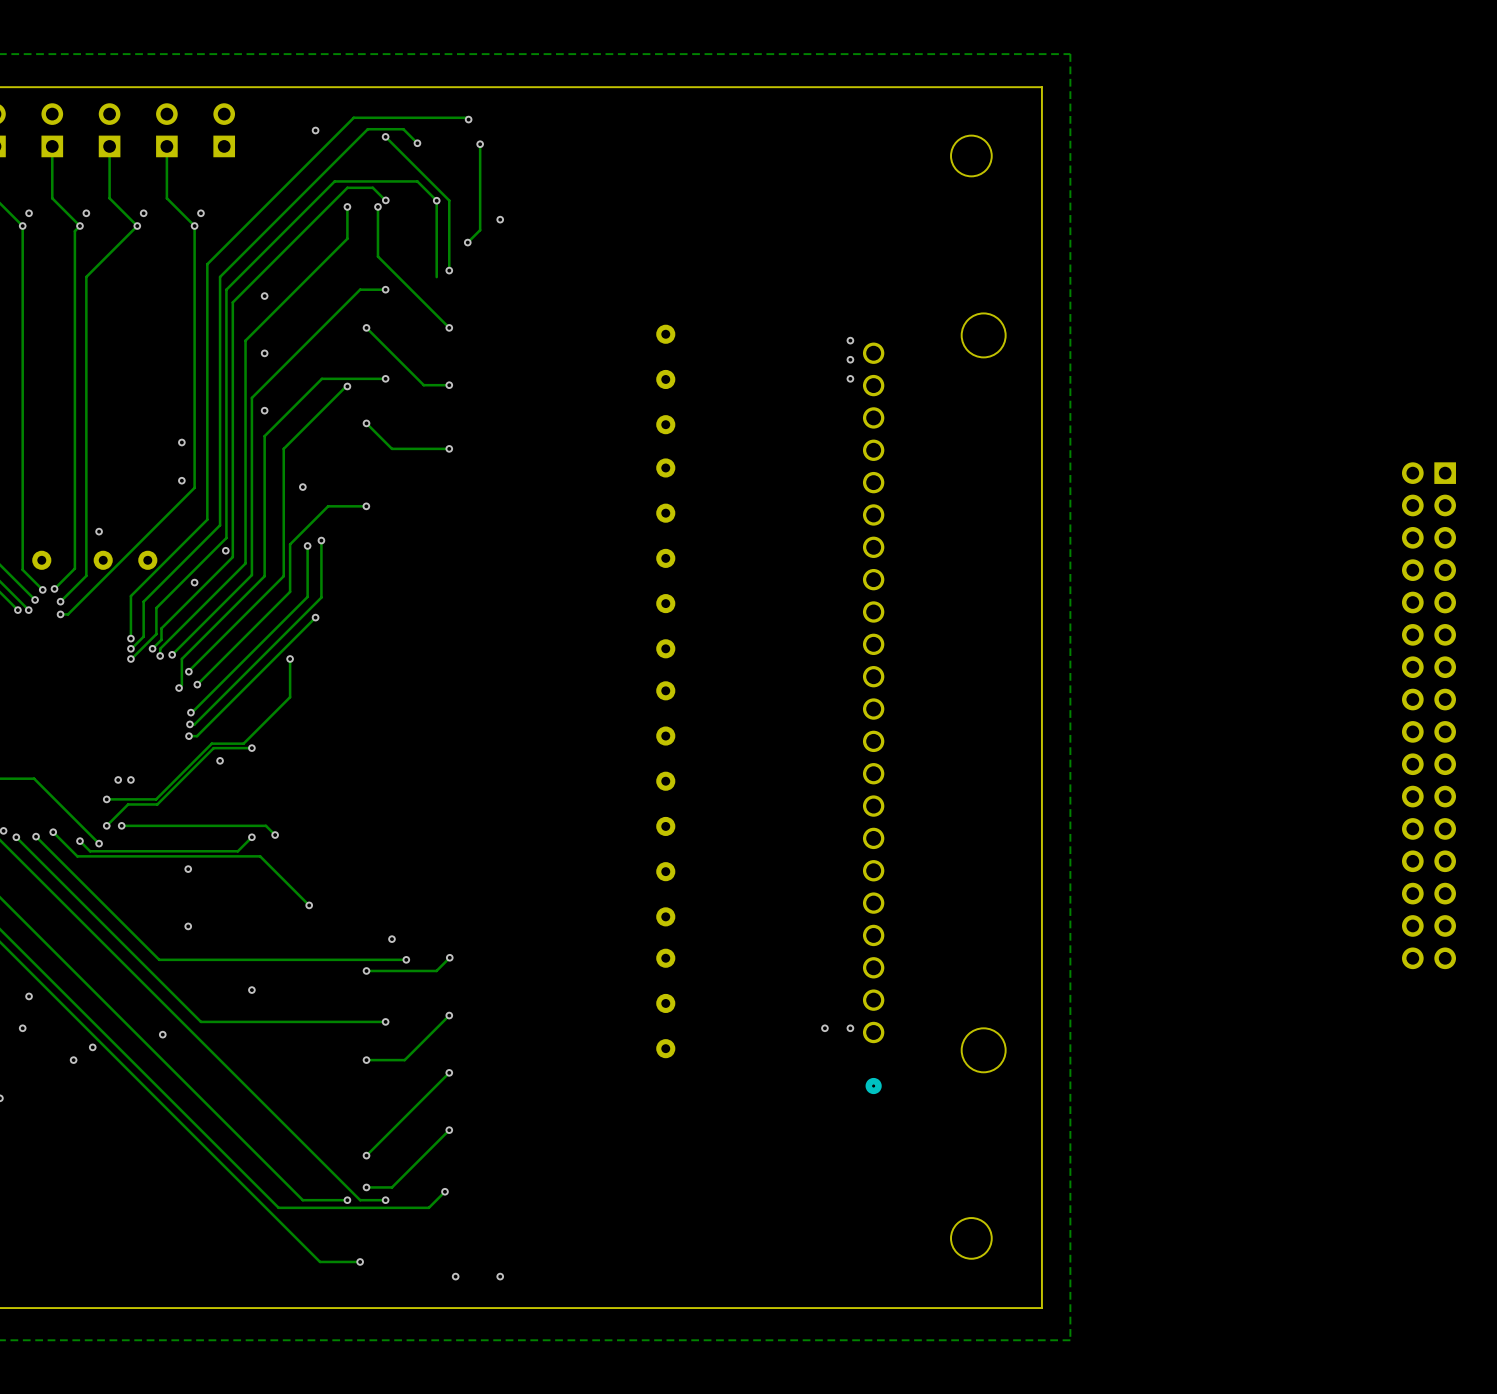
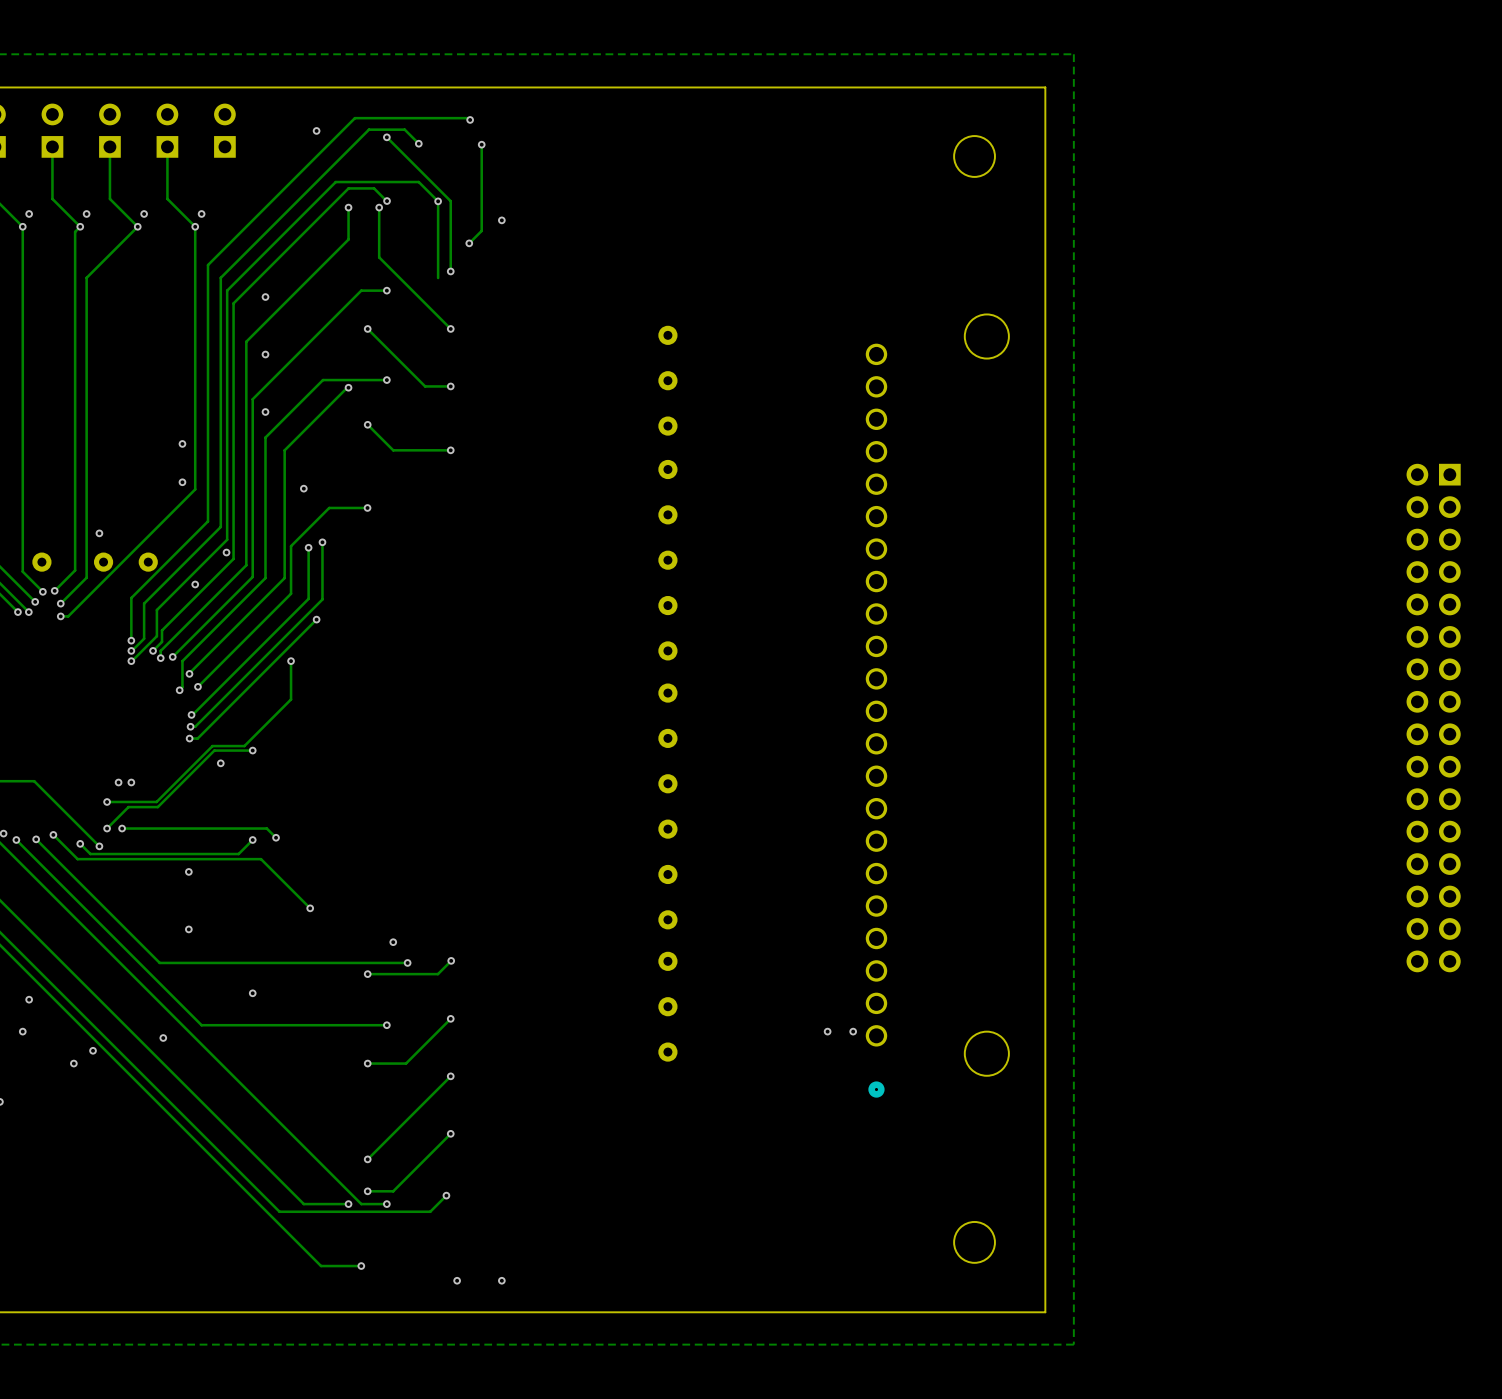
via: (850, 340) -> none
via: (850, 359) -> none
via: (850, 378) -> none

